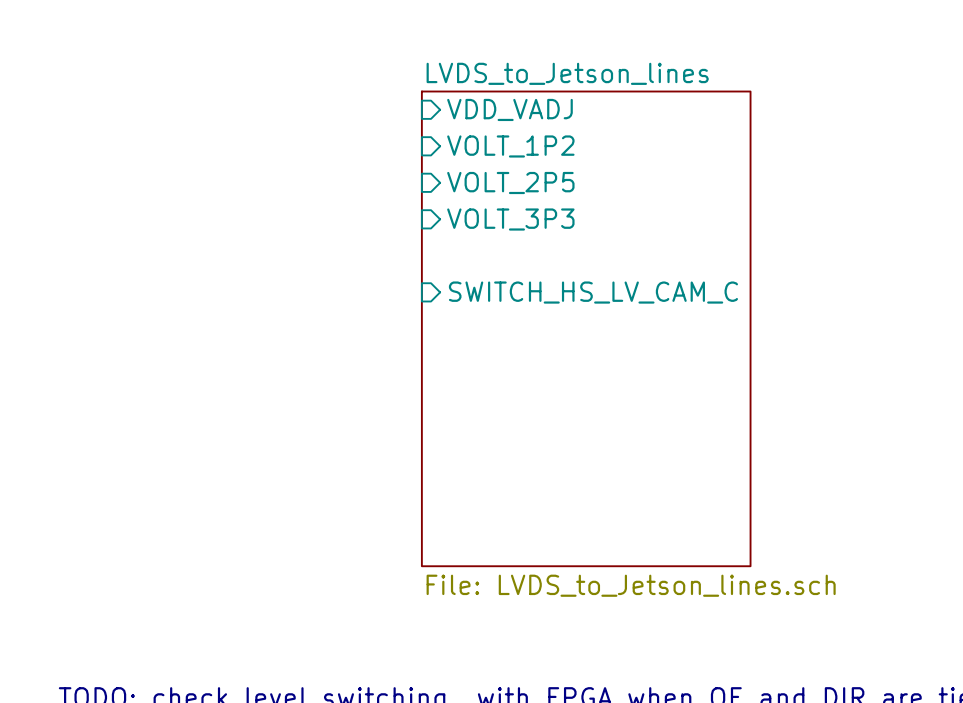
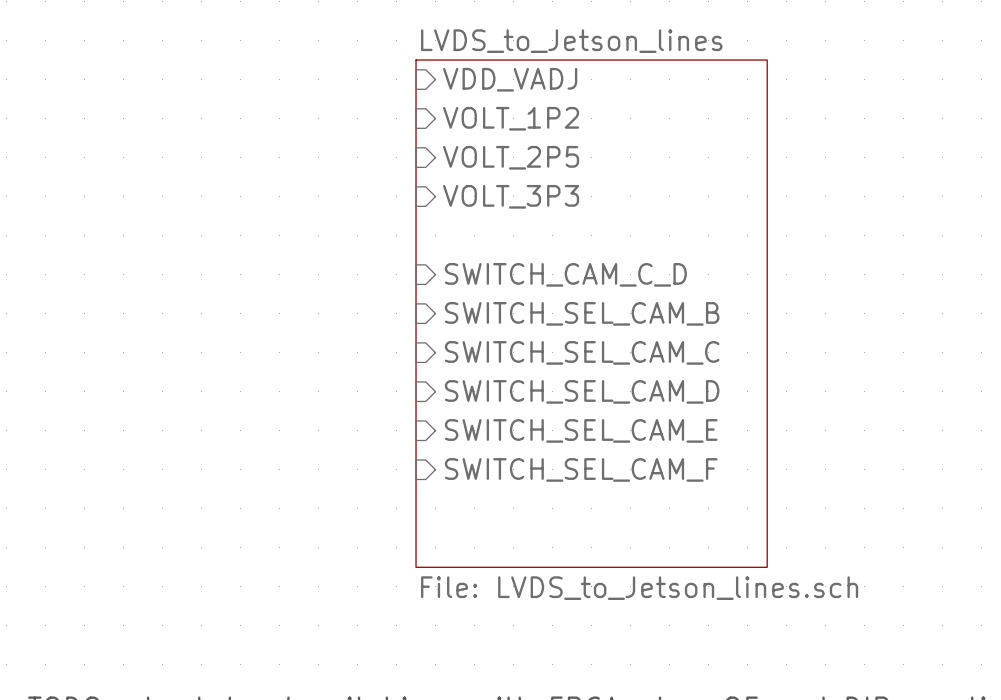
sheet pin: SWITCH_HS_LV_CAM_C (593, 292) -> SWITCH_CAM_C_D (565, 274)
sheet pin: none -> SWITCH_SEL_CAM_B (582, 313)
sheet pin: none -> SWITCH_SEL_CAM_C (582, 352)
sheet pin: none -> SWITCH_SEL_CAM_D (582, 391)
sheet pin: none -> SWITCH_SEL_CAM_E (581, 430)
sheet pin: none -> SWITCH_SEL_CAM_F (581, 469)

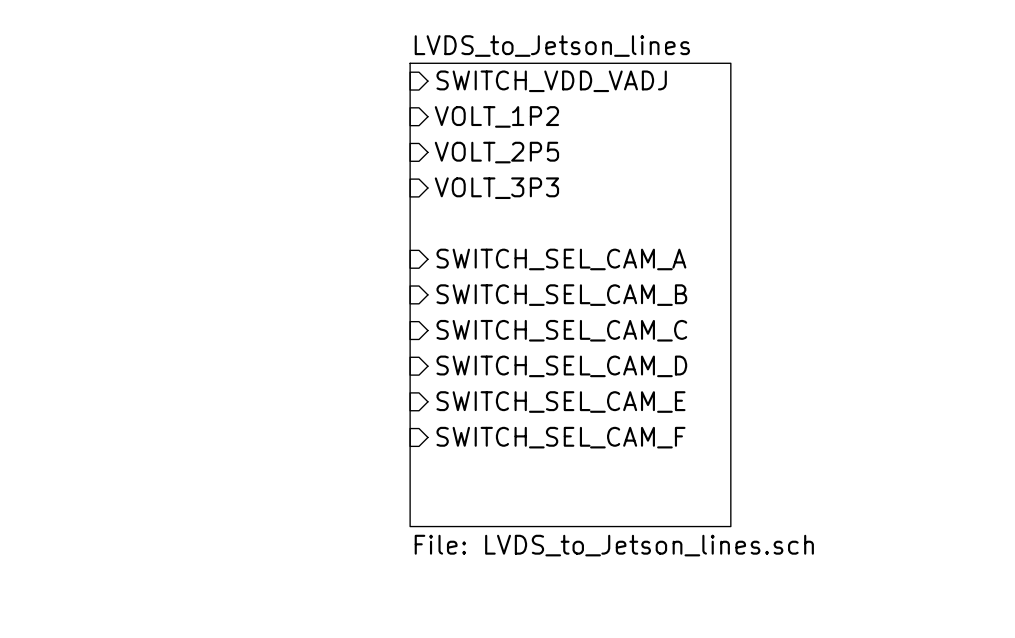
sheet pin: VDD_VADJ (510, 79) -> SWITCH_VDD_VADJ (551, 81)
sheet pin: SWITCH_CAM_C_D (565, 274) -> SWITCH_SEL_CAM_A (561, 259)

